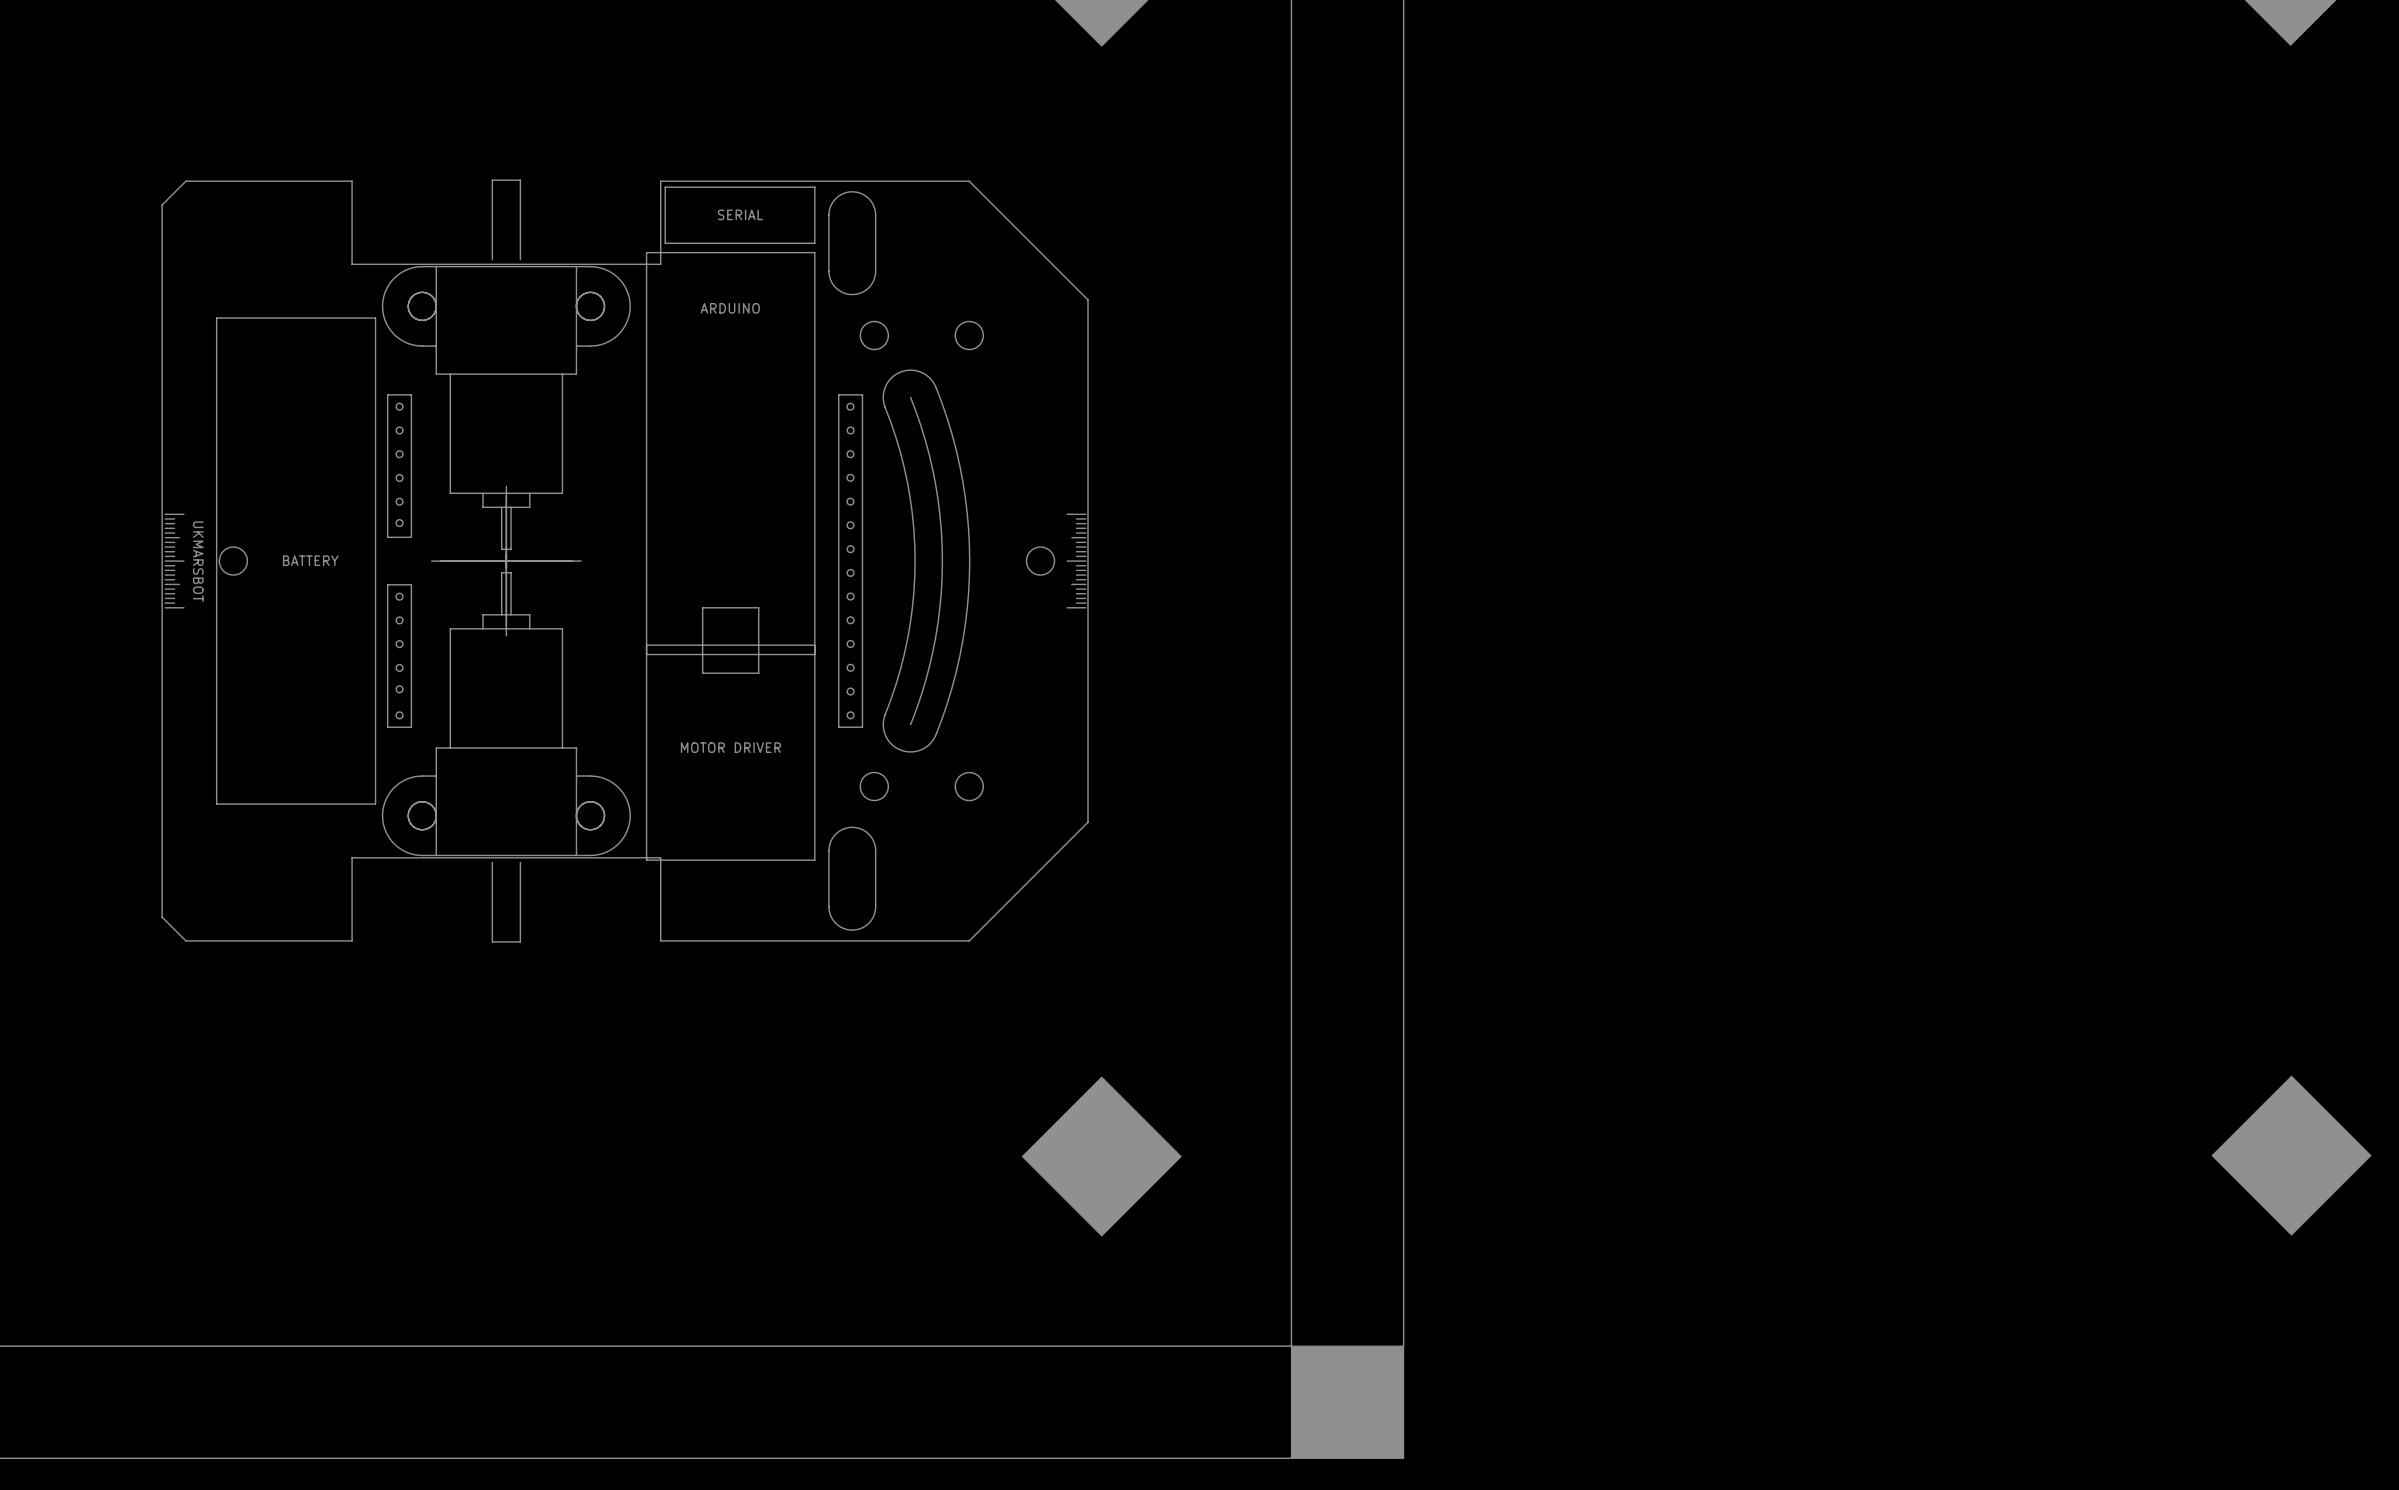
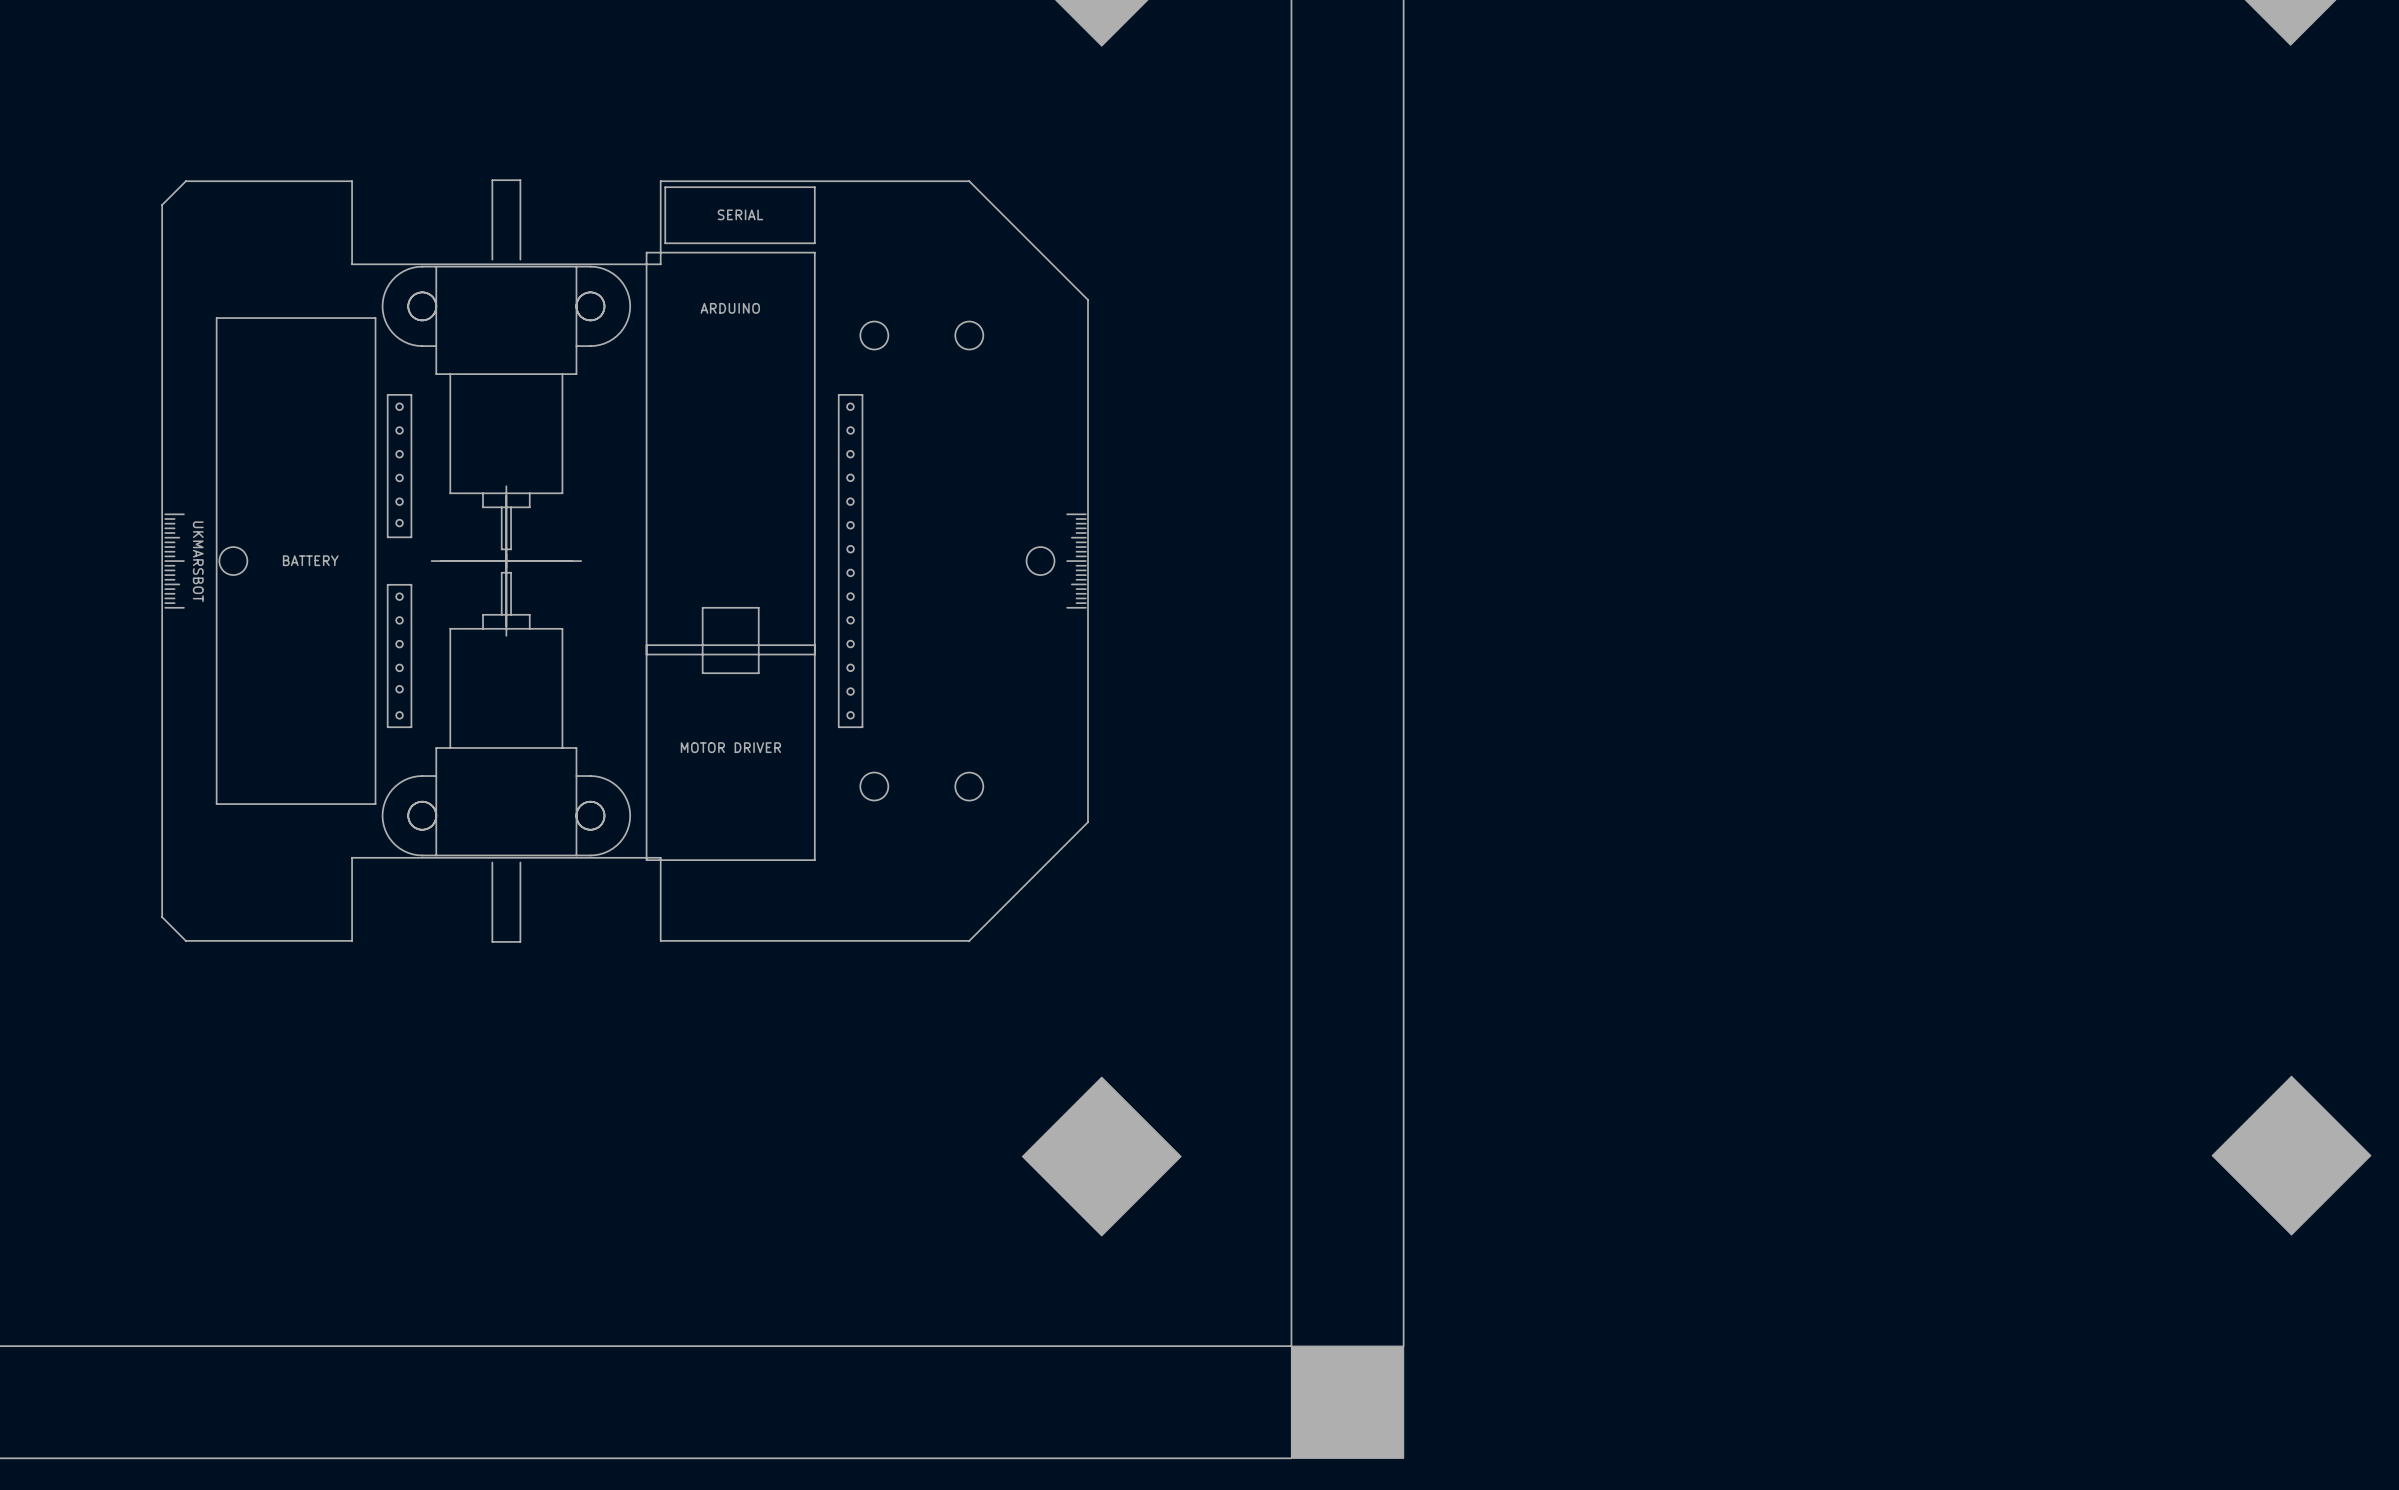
line: (828, 215) (828, 271) (830, 280) (835, 287) (843, 292) (852, 294) (861, 292) (870, 285) (875, 274) (875, 215) (873, 206) (863, 194) (855, 191) (846, 192) (833, 200) (828, 215) -> none
line: (936, 388) (931, 379) (923, 373) (907, 370) (892, 376) (886, 384) (883, 393) (883, 403) (900, 451) (907, 482) (913, 529) (915, 561) (913, 592) (907, 639) (883, 725) (885, 736) (892, 744) (908, 751) (918, 750) (930, 743) (942, 718) (959, 657) (968, 593) (969, 544) (965, 496) (951, 433) (936, 388) -> none
line: (910, 397) (925, 440) (935, 485) (940, 515) (942, 561) (941, 591) (935, 636) (925, 681) (910, 724) -> none
line: (828, 850) (828, 906) (830, 915) (835, 923) (843, 928) (852, 930) (861, 928) (870, 921) (875, 909) (875, 850) (873, 841) (863, 830) (849, 827) (840, 830) (833, 836) (828, 850) -> none

